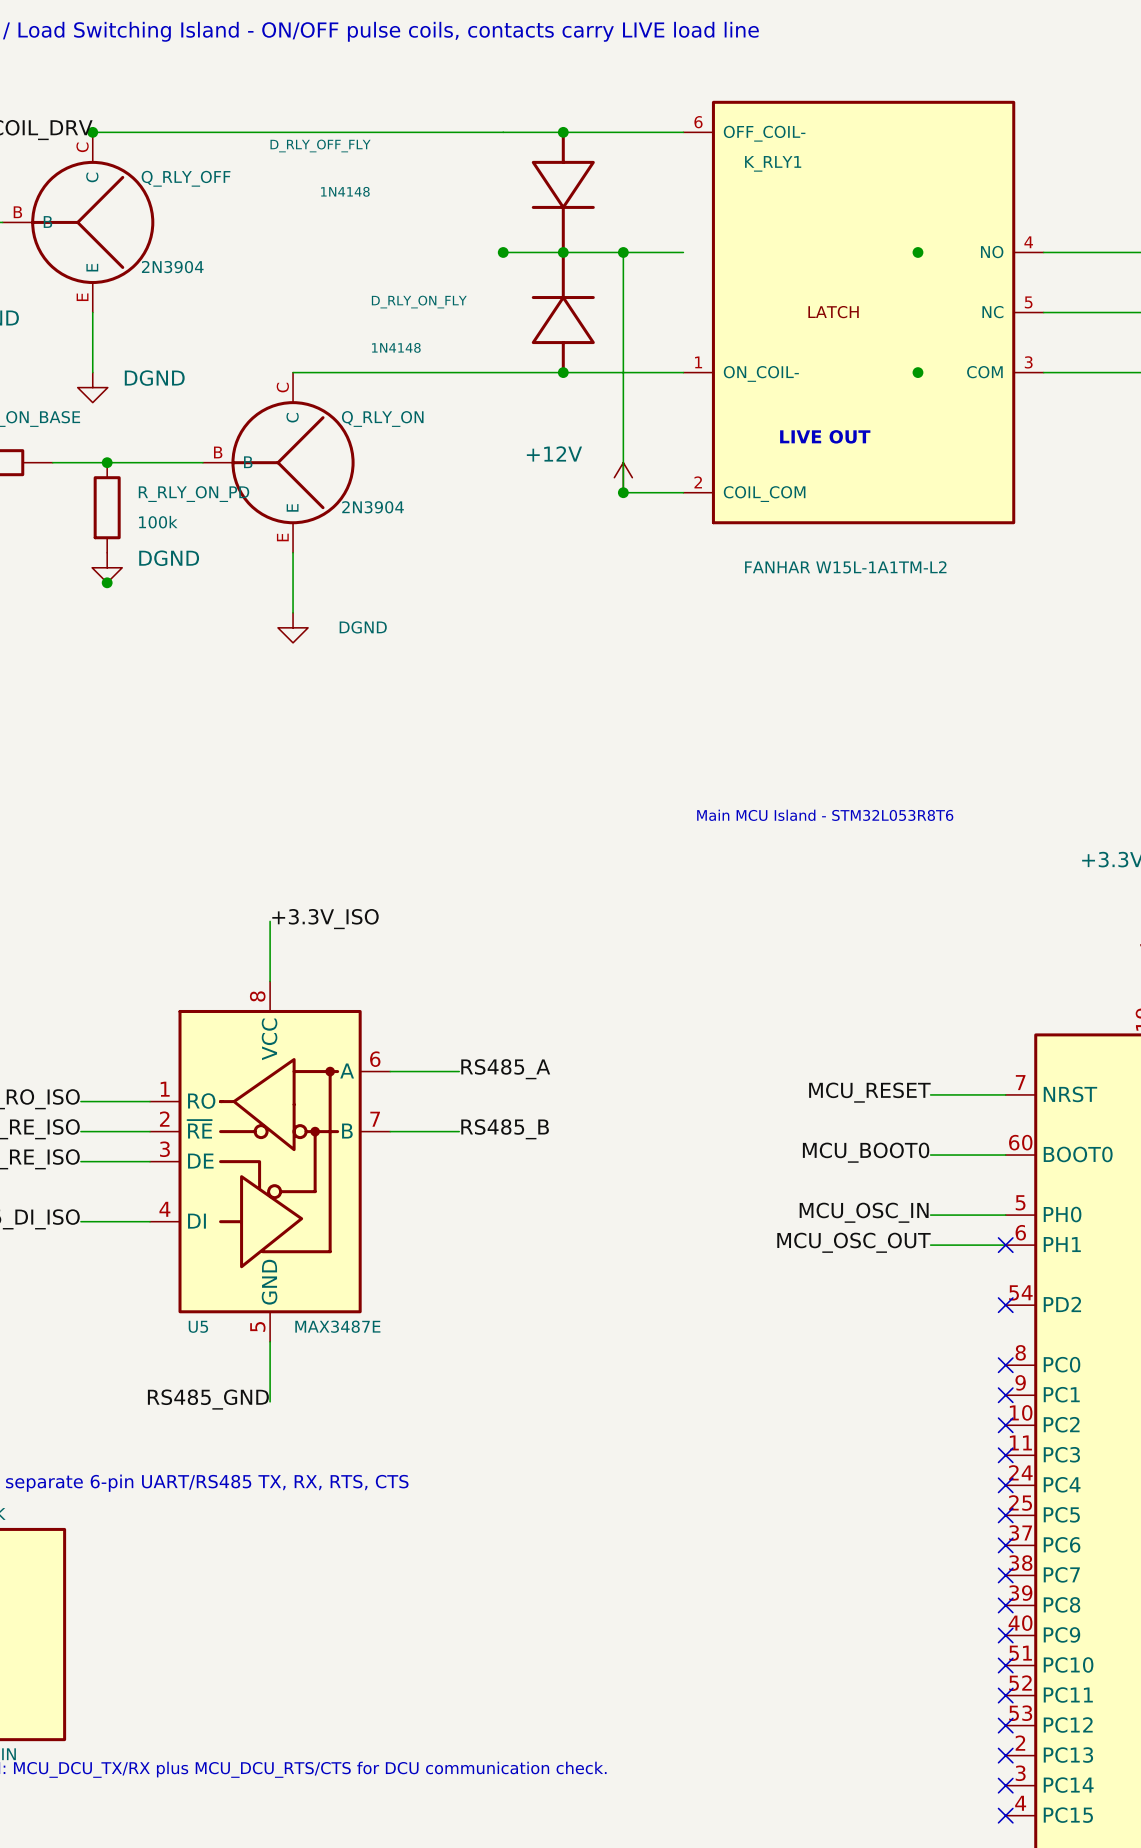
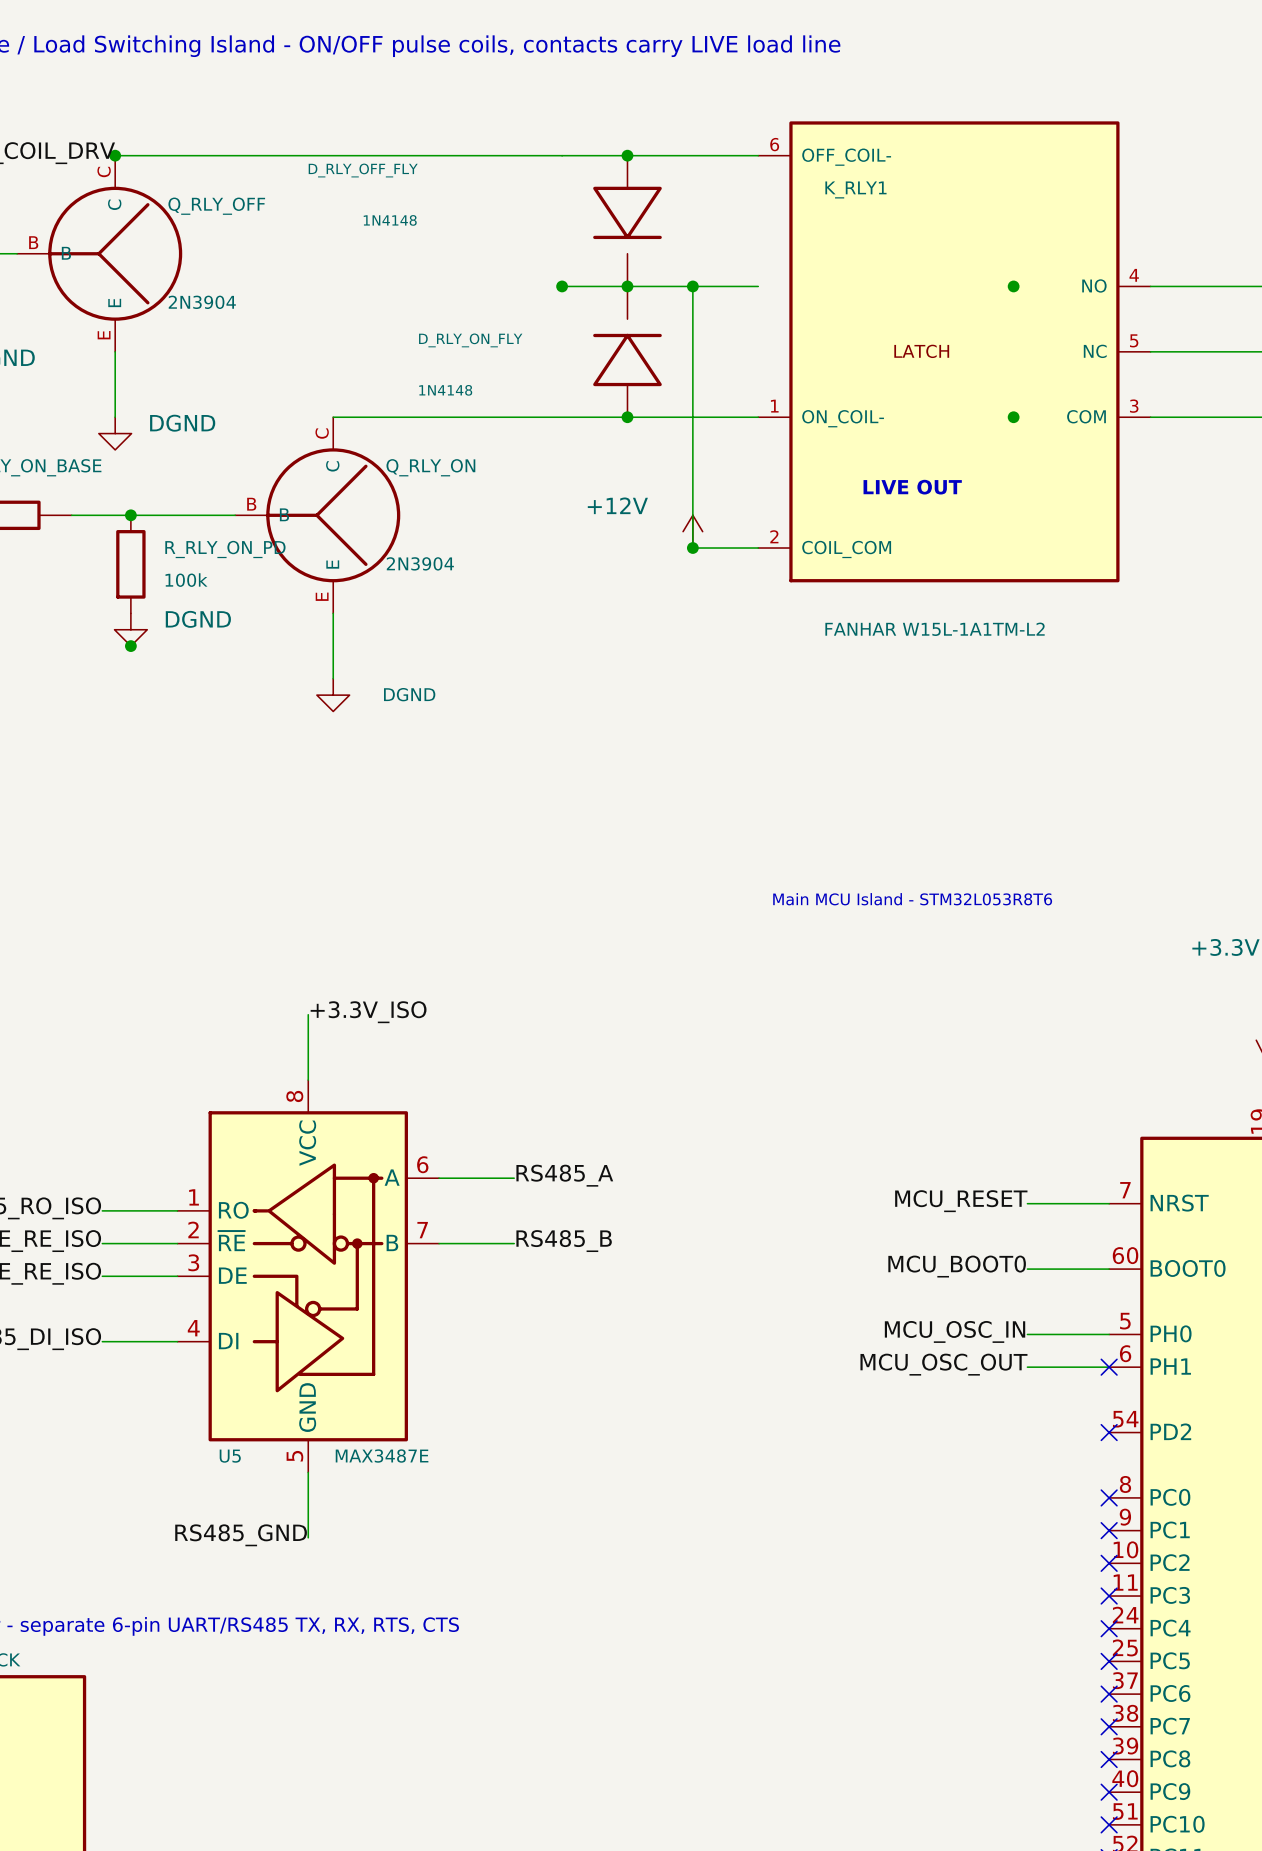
D_RLY_OFF_FLY symbol: [531, 130, 595, 254] -> [593, 155, 662, 287]
D_RLY_ON_FLY symbol: [531, 250, 595, 375] -> [593, 286, 662, 418]

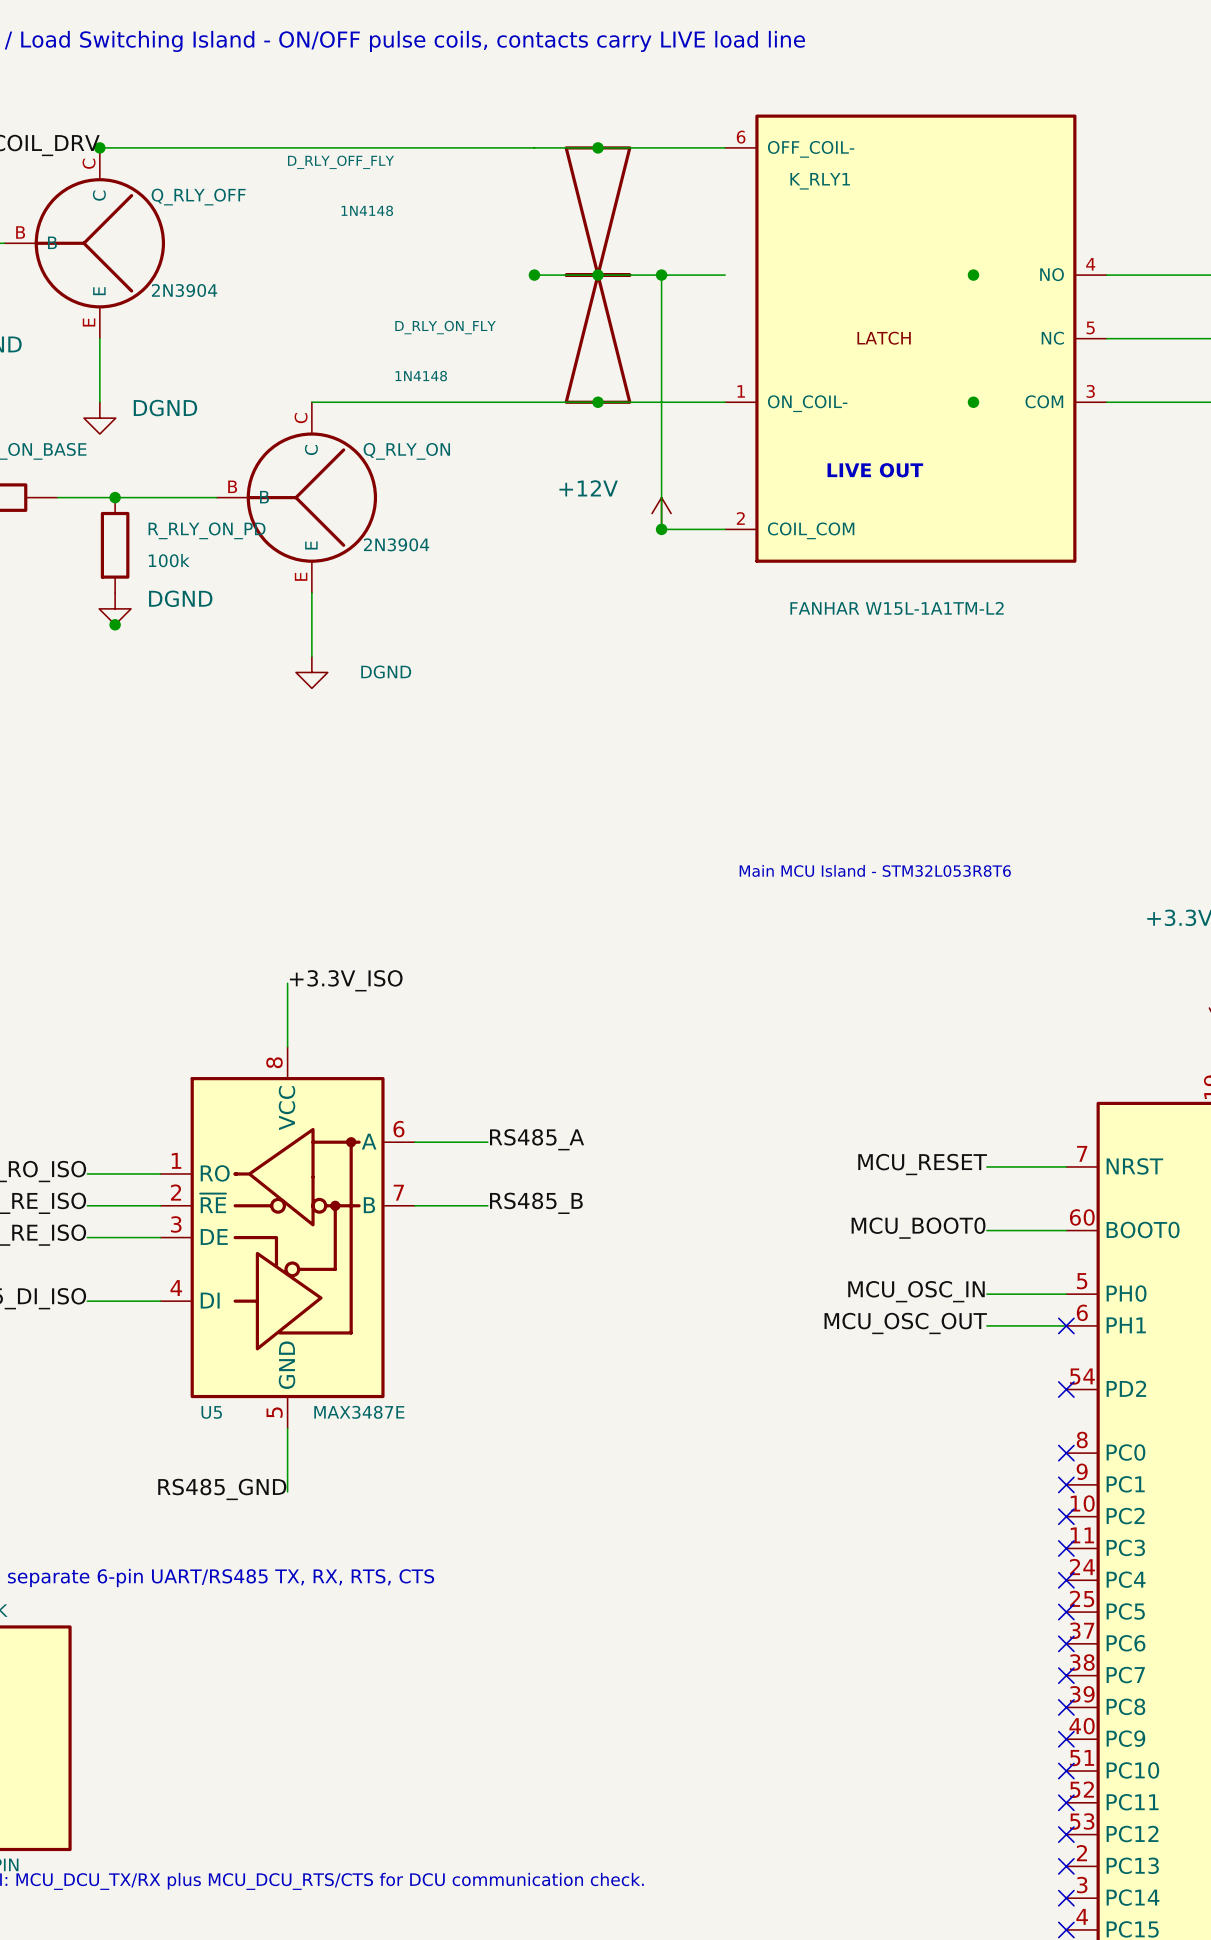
D_RLY_OFF_FLY symbol: [593, 155, 662, 287] -> [564, 146, 632, 277]
D_RLY_ON_FLY symbol: [593, 286, 662, 418] -> [564, 273, 632, 404]

